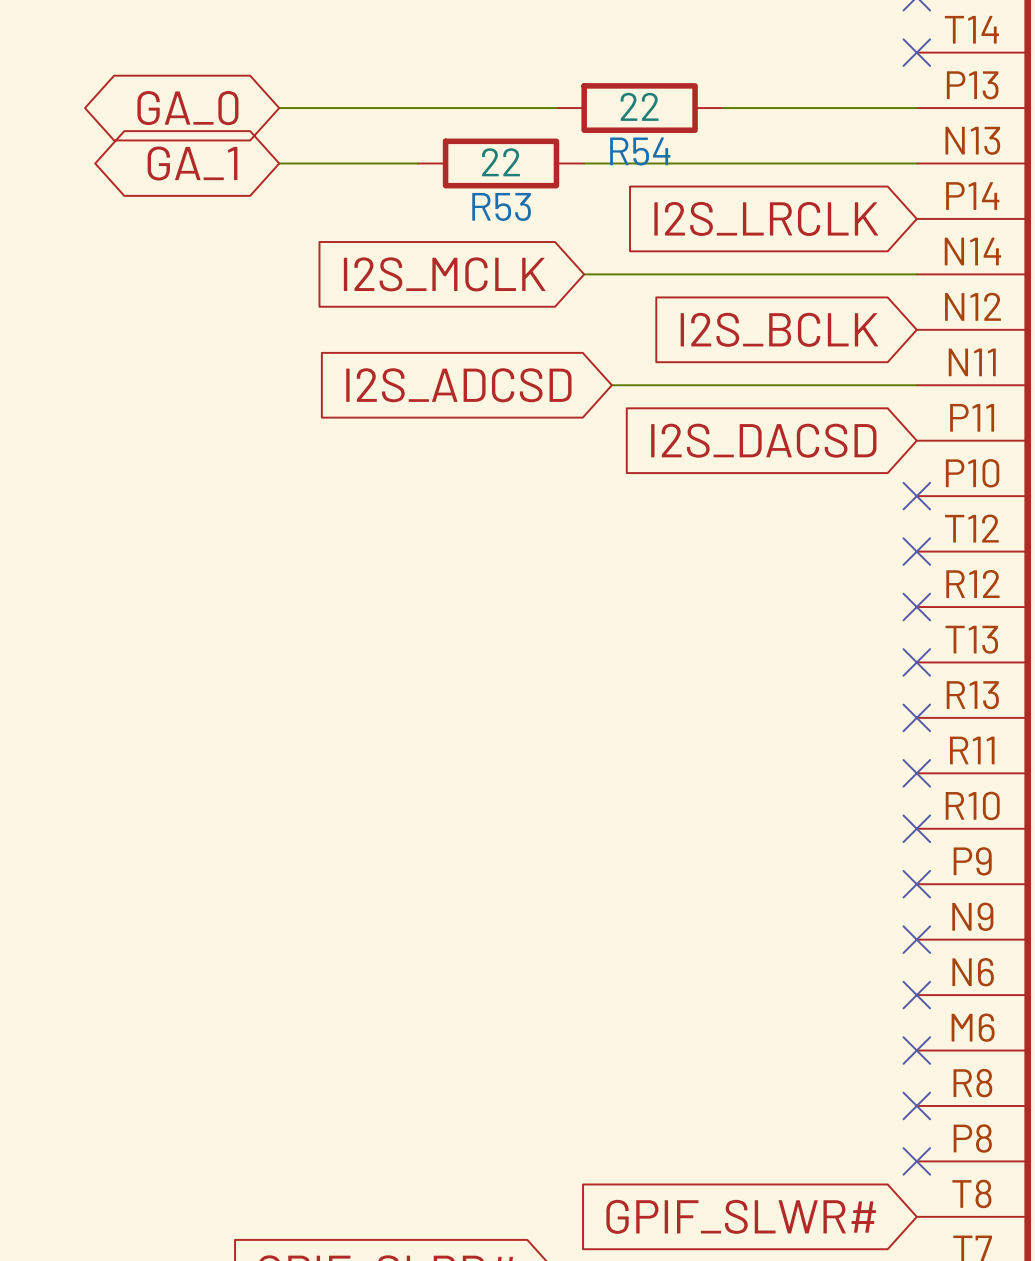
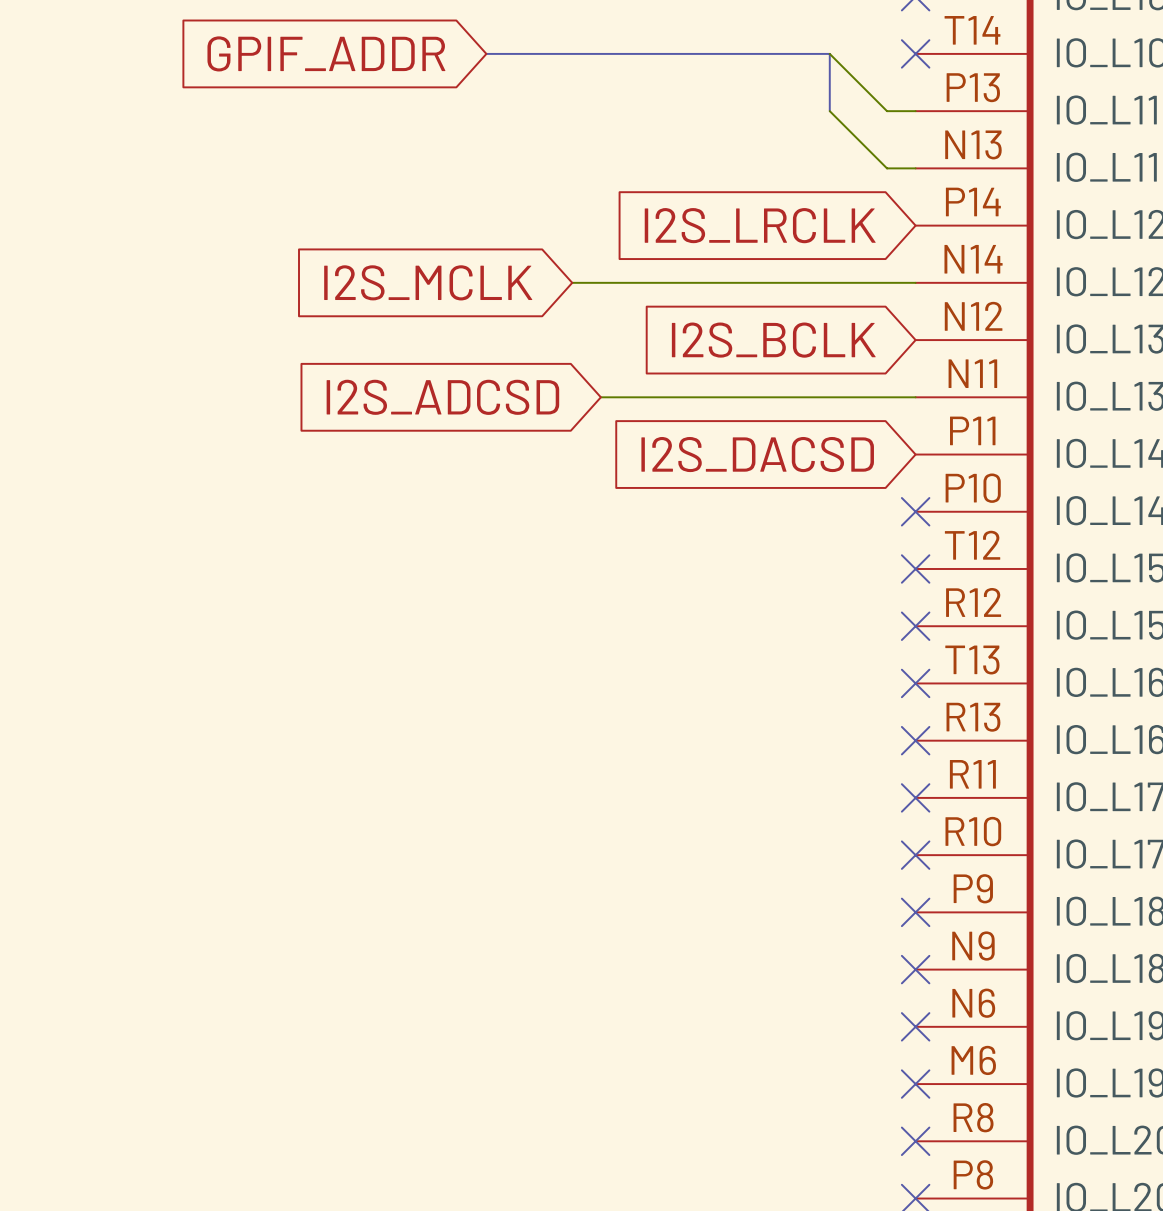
global label: none -> GPIF_ADDR (326, 53)
bus: none -> (486, 53) (829, 53) (829, 111)
global label: GA_0 (187, 108) -> none
wire: (279, 108) (556, 108) -> none
R54: 22 (639, 108) -> none
wire: (722, 108) (889, 108) -> (829, 53) (887, 111)
global label: GA_1 (192, 163) -> none
wire: (279, 163) (417, 163) -> none
R53: 22 (501, 163) -> none
wire: (584, 163) (889, 163) -> (829, 111) (887, 168)

